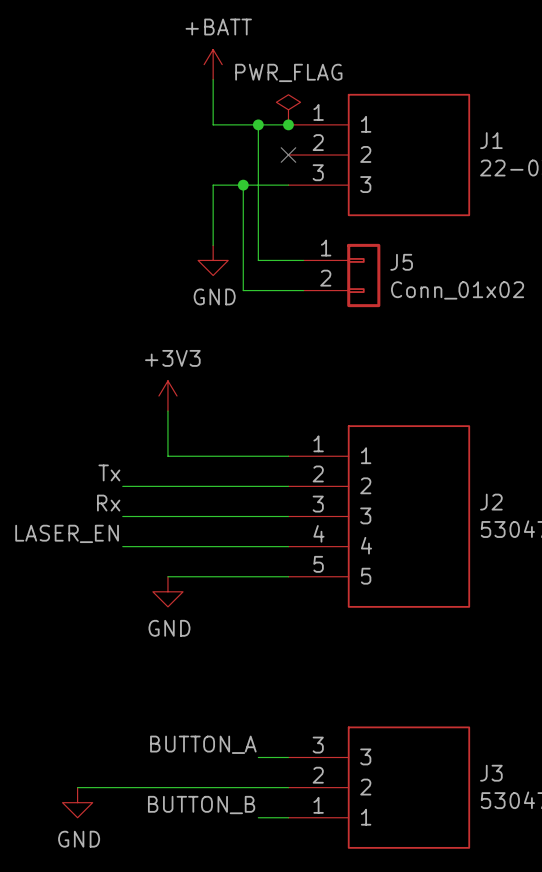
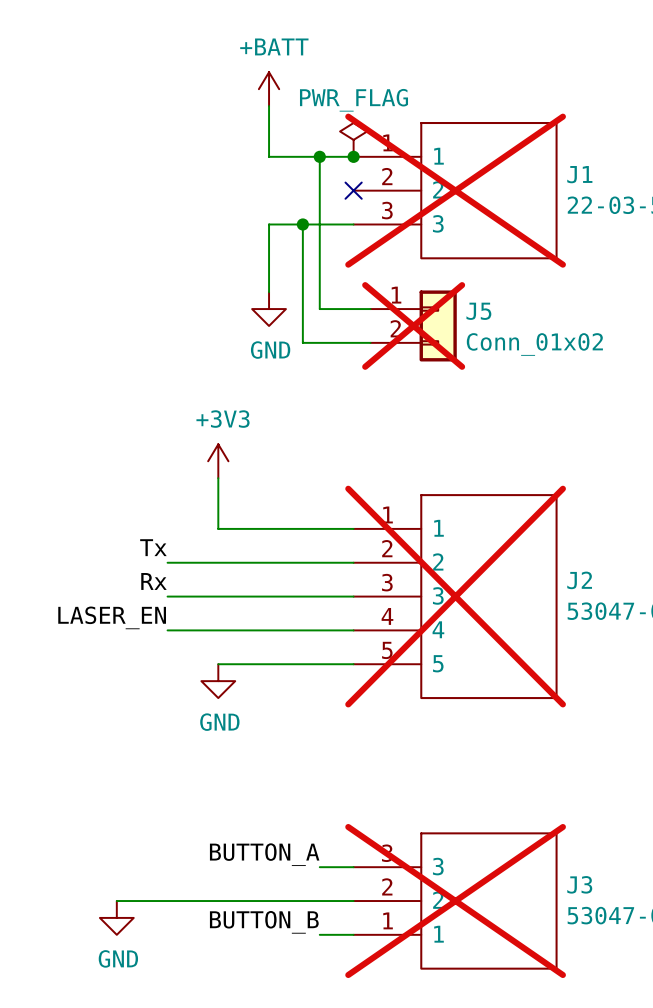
J1 do-not-place cross: none -> (455, 190)
J5 do-not-place cross: none -> (413, 325)
J2 do-not-place cross: none -> (455, 596)
J3 do-not-place cross: none -> (455, 901)

